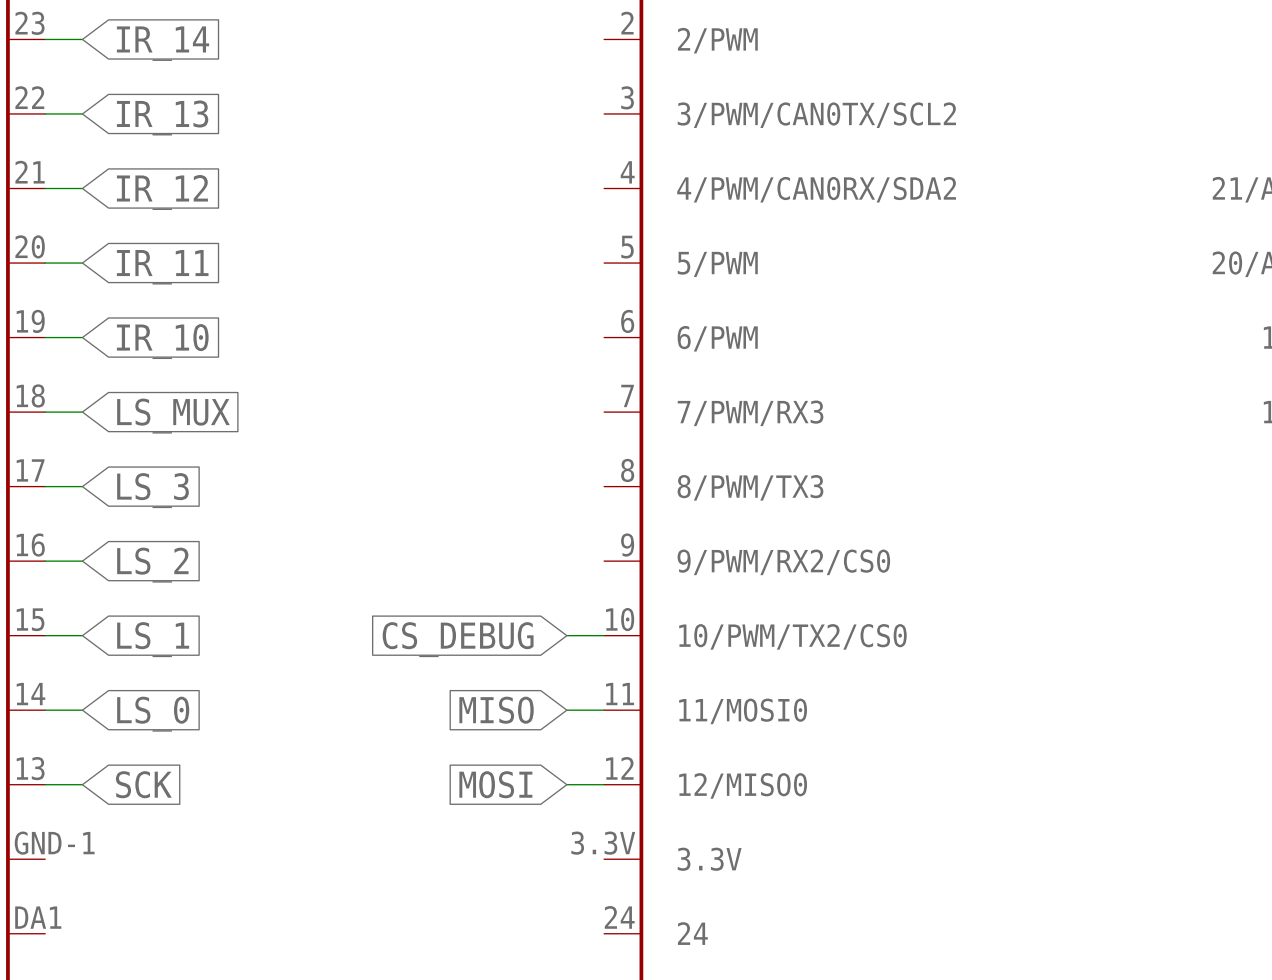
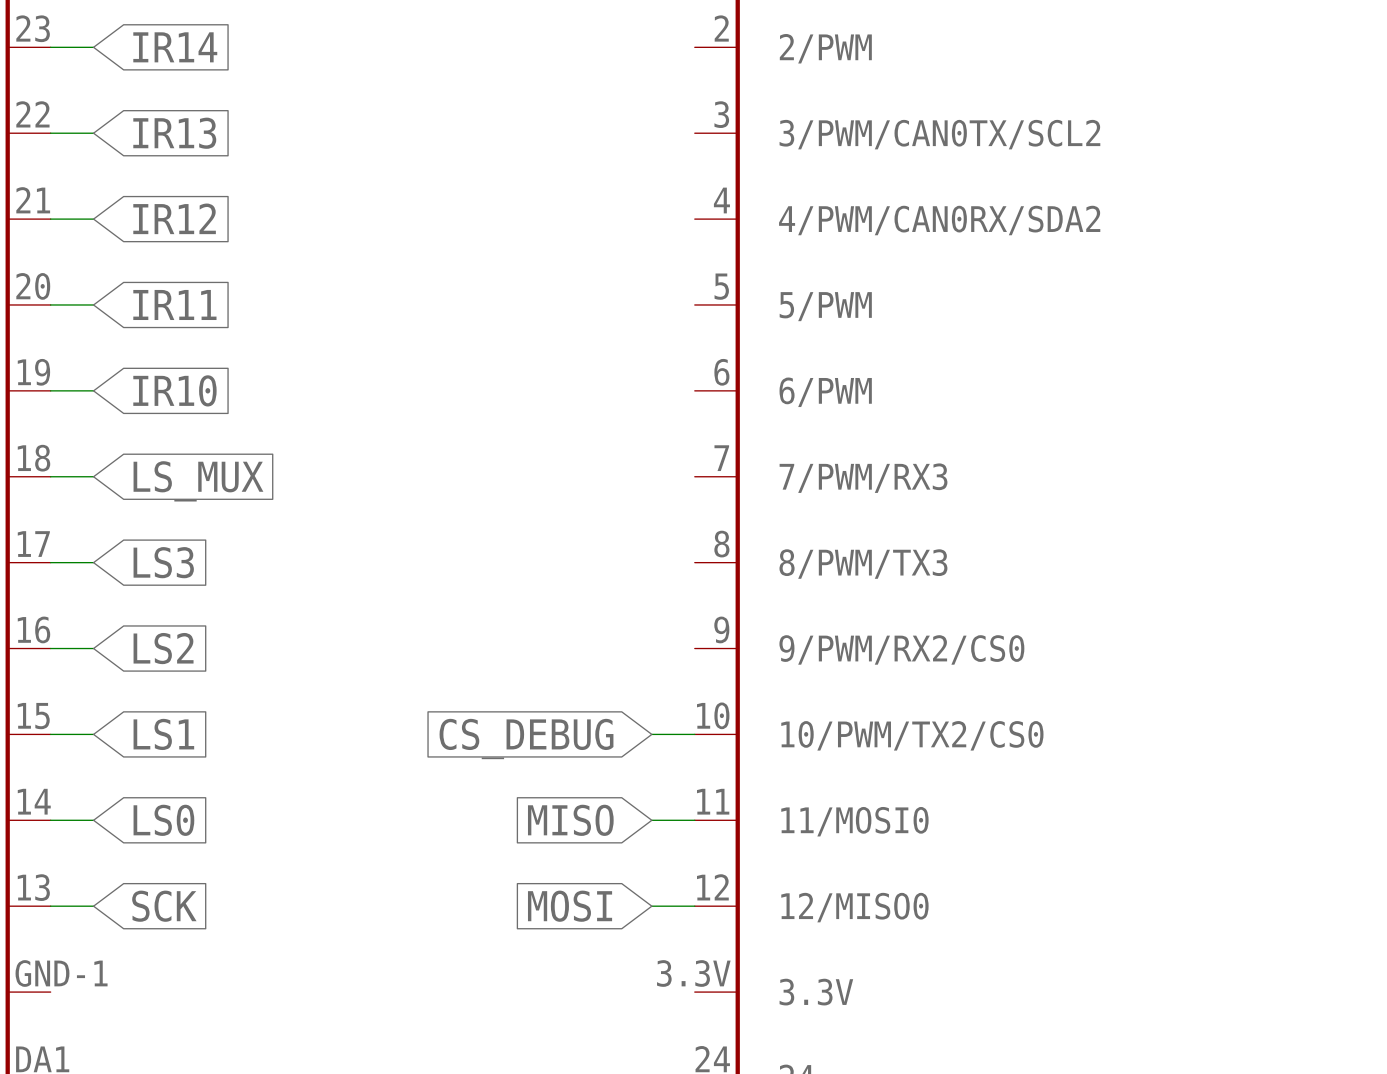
global label: IR_14 (163, 43) -> IR14 (175, 47)
global label: IR_13 (162, 117) -> IR13 (174, 133)
global label: IR_12 (162, 192) -> IR12 (174, 218)
global label: IR_11 (162, 267) -> IR11 (174, 304)
global label: IR_10 (162, 341) -> IR10 (174, 390)
global label: LS_3 (153, 490) -> LS3 (163, 562)
global label: LS_2 (152, 565) -> LS2 (163, 648)
global label: LS_1 (153, 639) -> LS1 (163, 734)
global label: LS_0 (153, 714) -> LS0 (163, 820)

